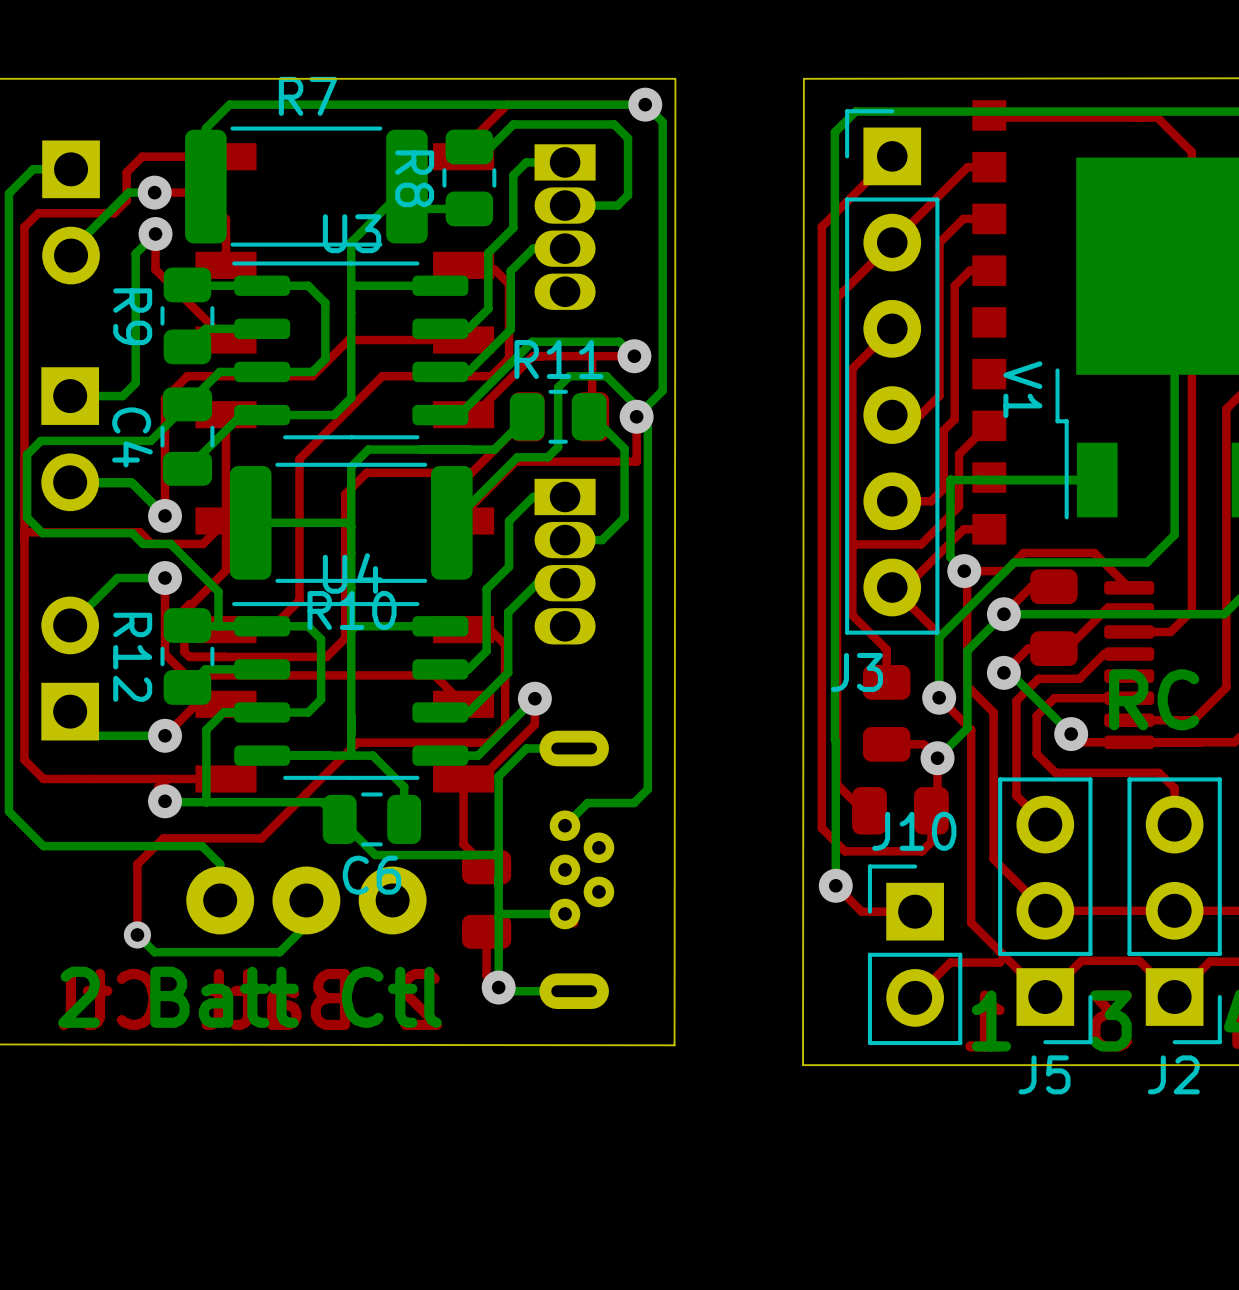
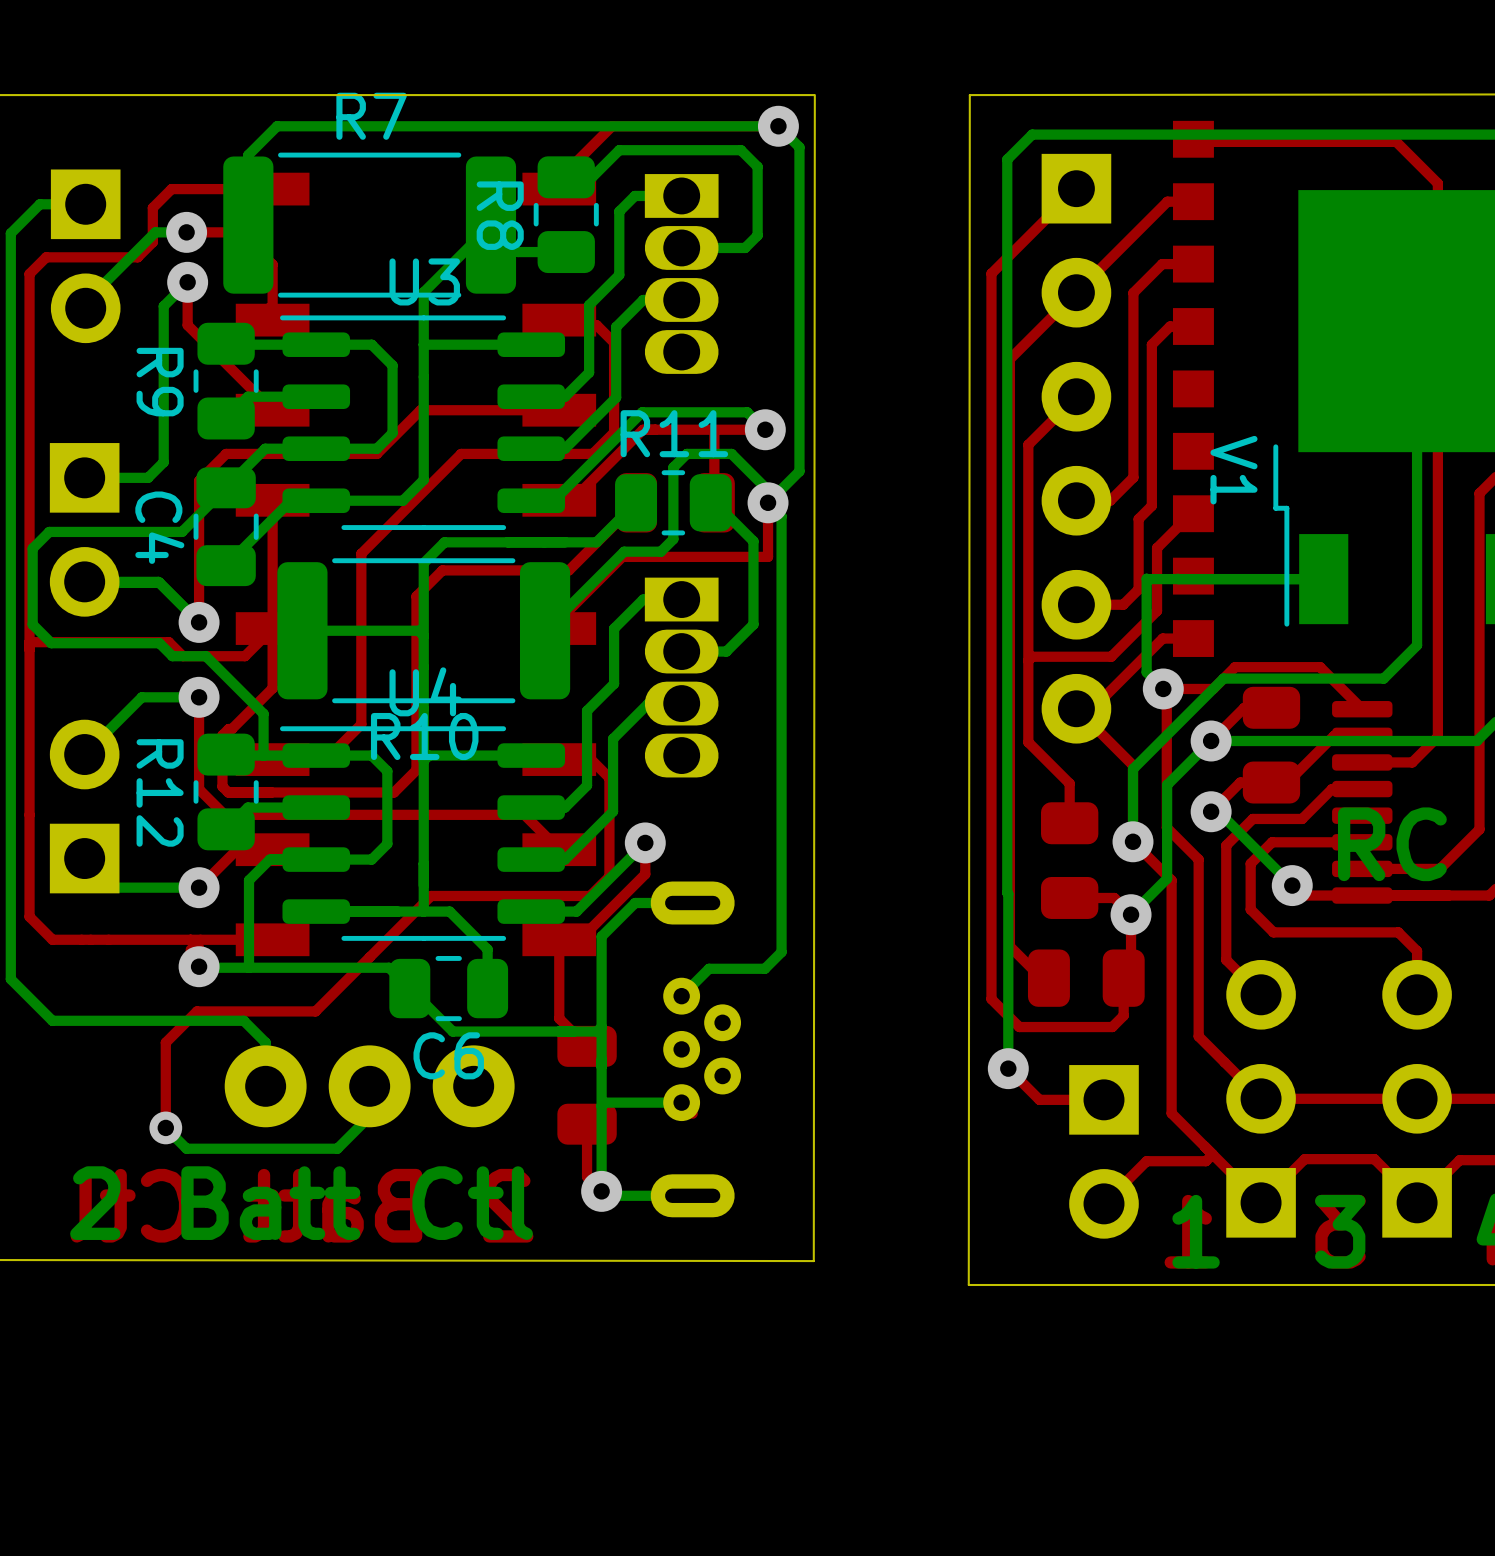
J3 side: bottom (892, 371) -> top (1076, 448)
J5 side: bottom (1045, 910) -> top (1261, 1098)
J2 side: bottom (1174, 910) -> top (1417, 1098)
J10 side: bottom (915, 954) -> top (1104, 1151)

